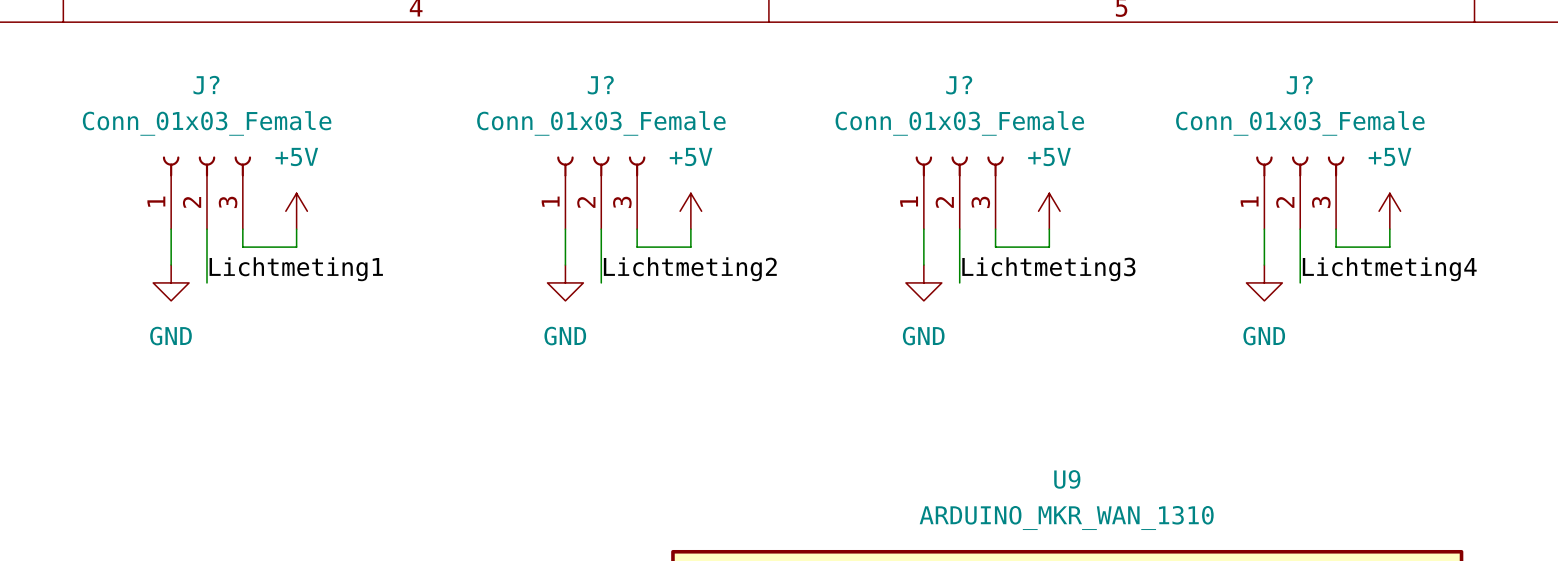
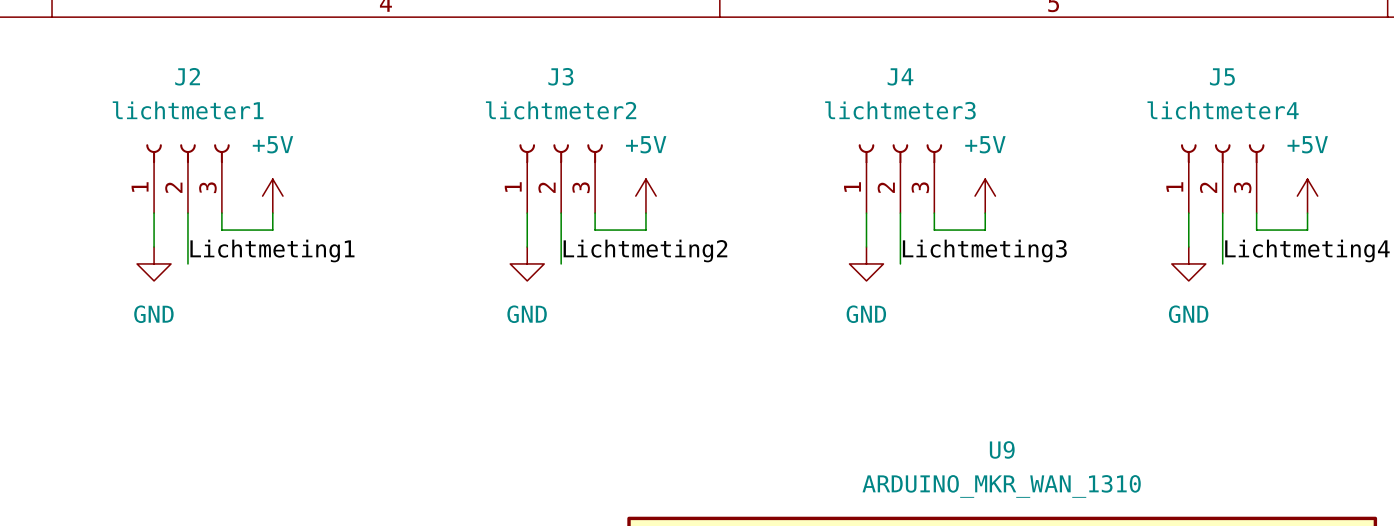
J? name: J? (206, 85) -> J2 (187, 76)
J? name: J? (600, 85) -> J3 (560, 76)
J? name: J? (959, 85) -> J4 (900, 76)
J? name: J? (1299, 85) -> J5 (1222, 76)
J? value: Conn_01x03_Female (207, 123) -> lichtmeter1 (188, 110)
J? value: Conn_01x03_Female (601, 123) -> lichtmeter2 (561, 110)
J? value: Conn_01x03_Female (959, 123) -> lichtmeter3 (900, 110)
J? value: Conn_01x03_Female (1300, 123) -> lichtmeter4 (1223, 110)

